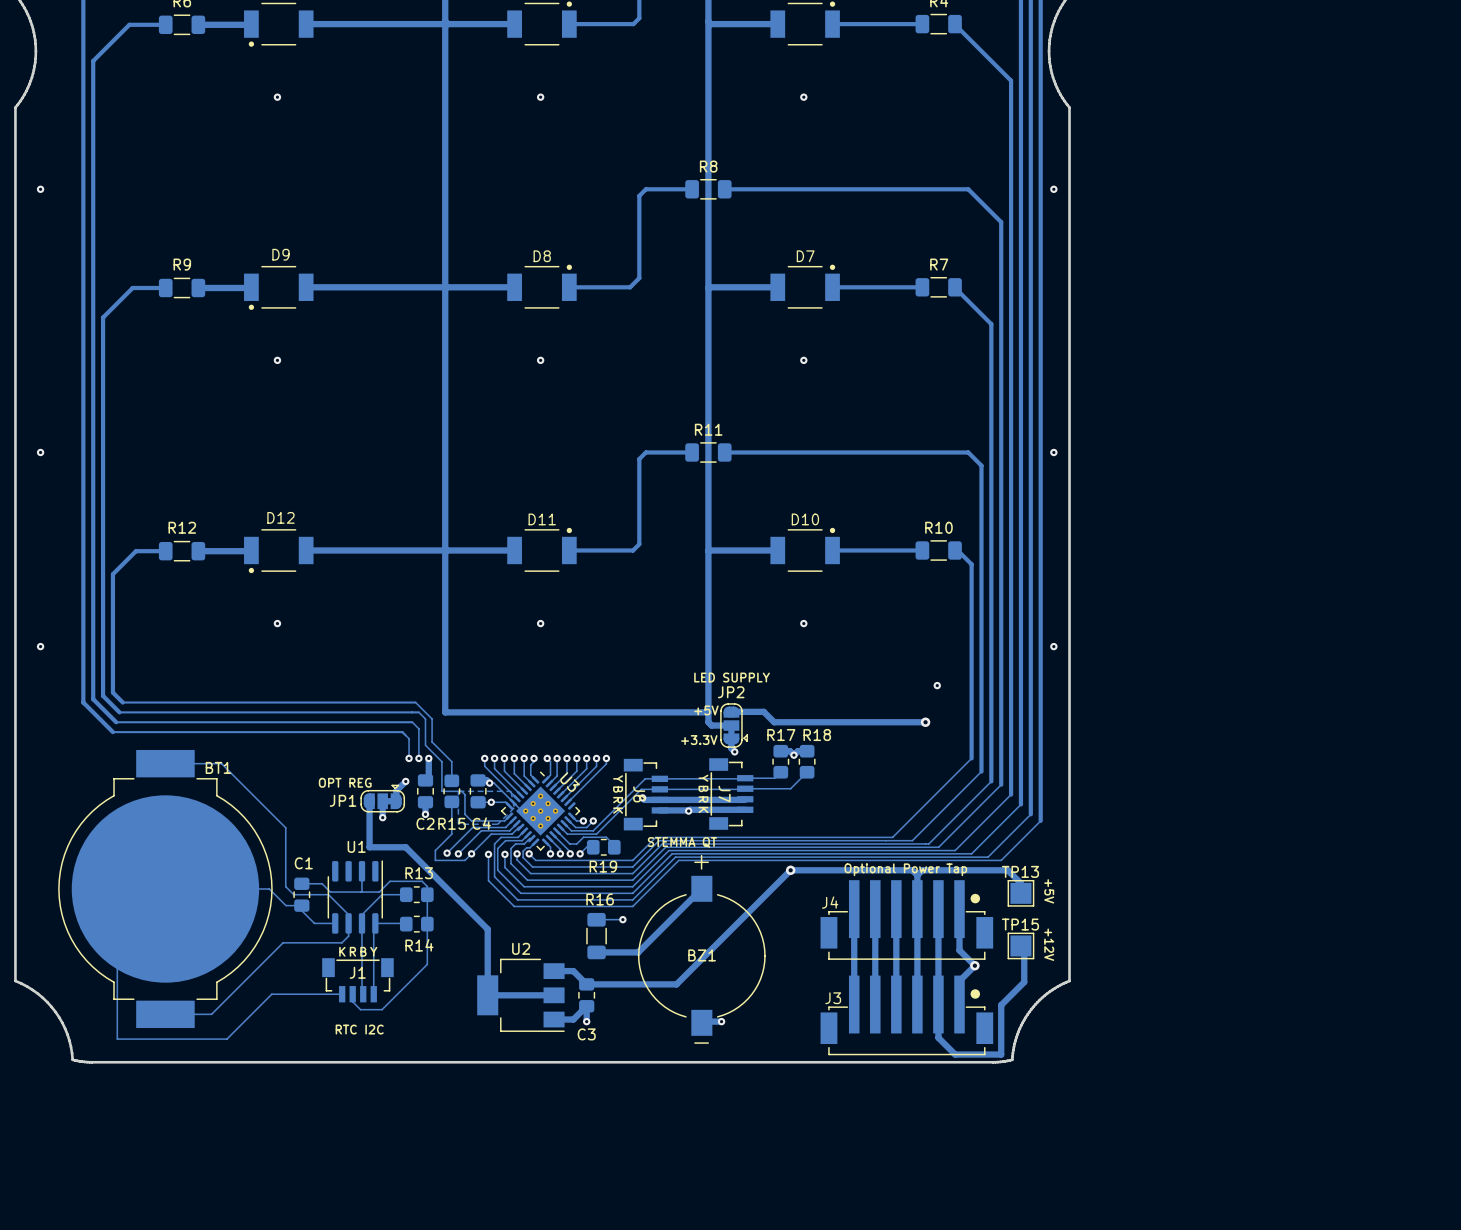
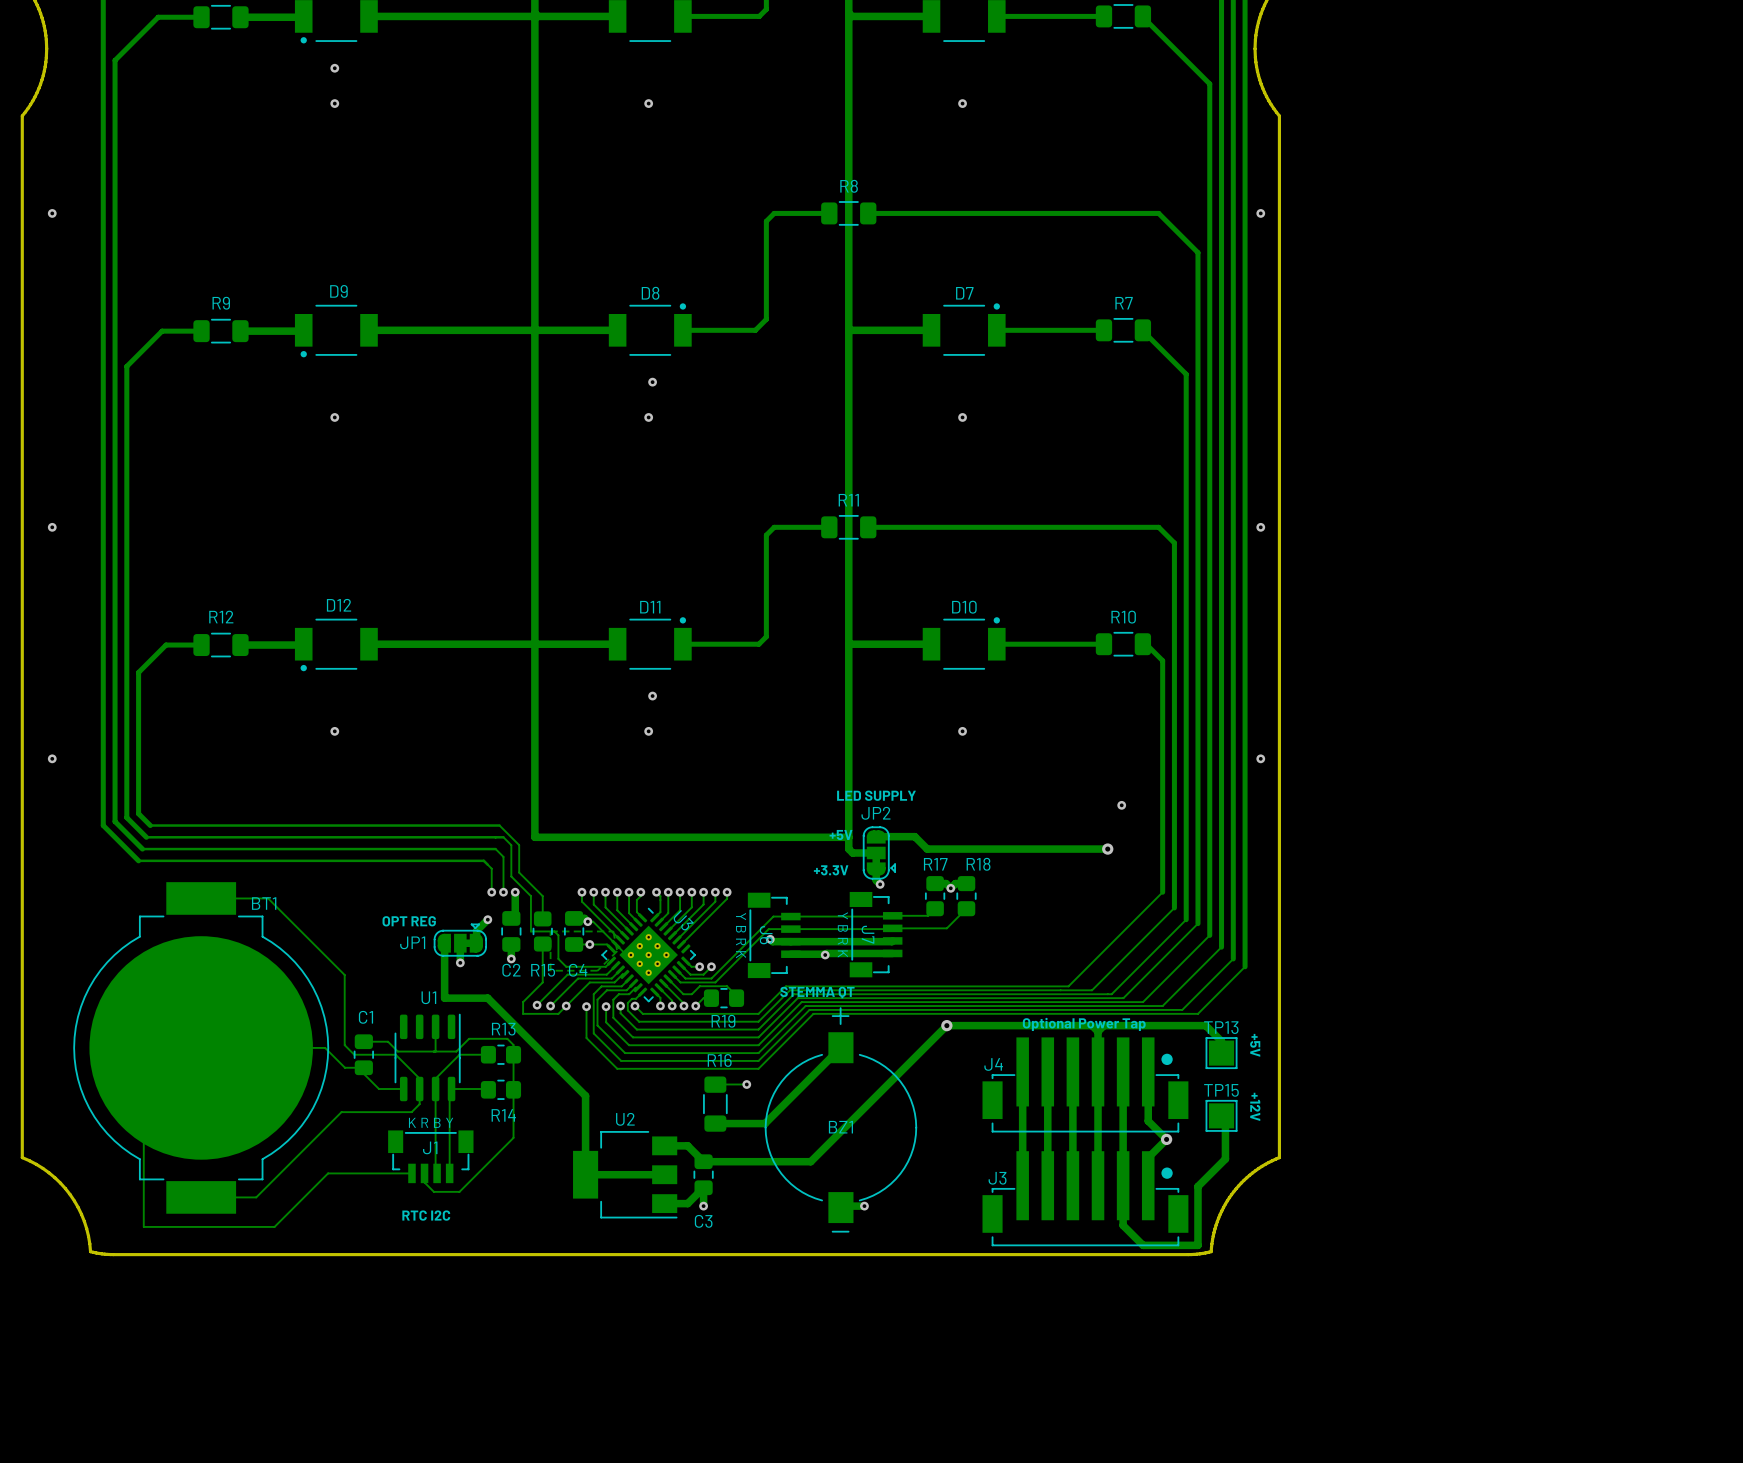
via: none -> (334, 68)
via: none -> (652, 382)
via: none -> (652, 696)

